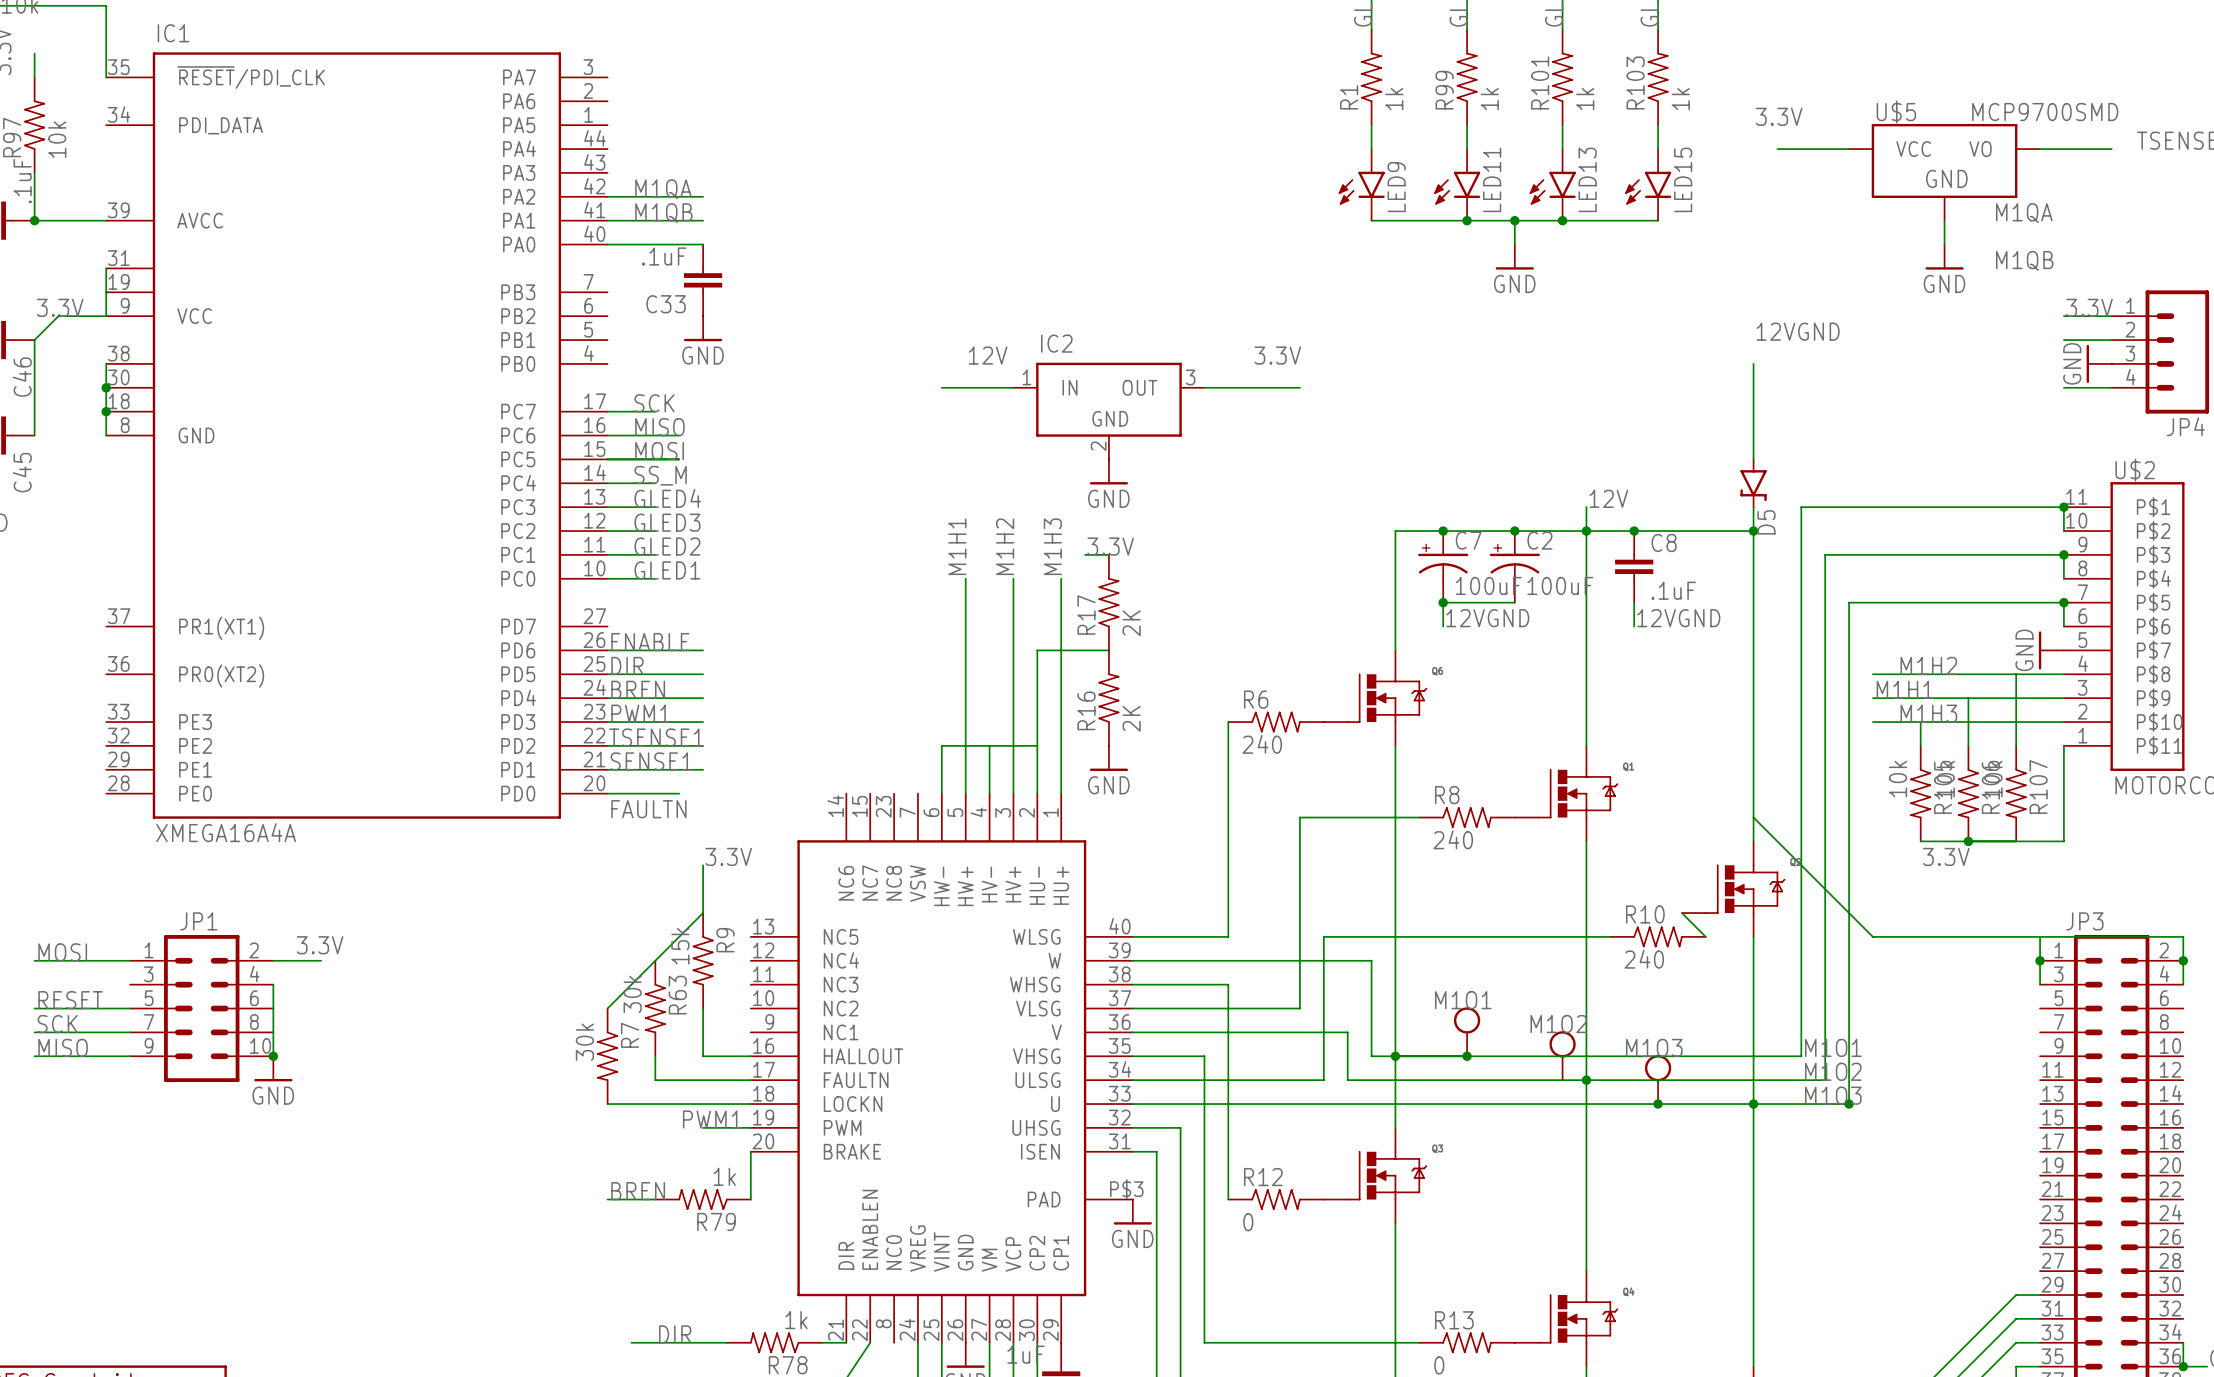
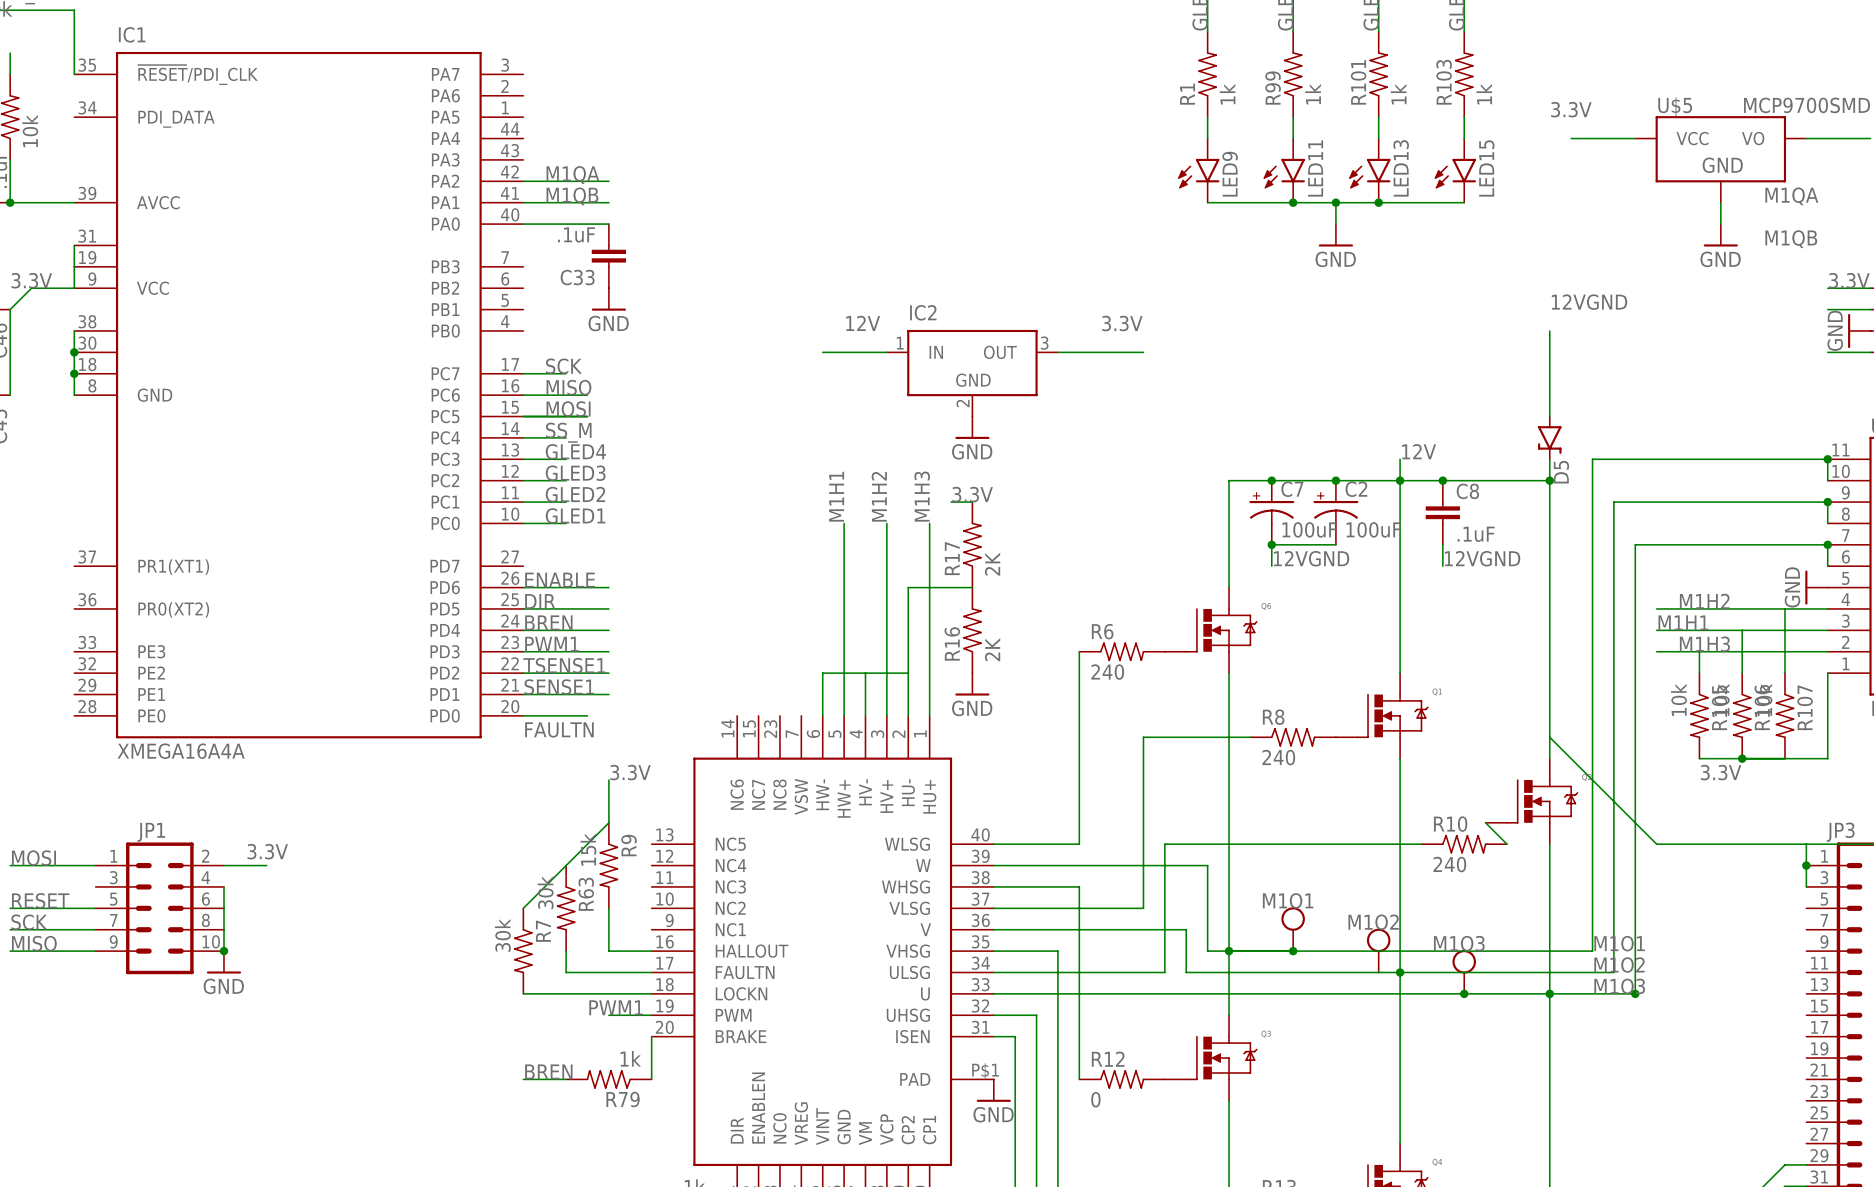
part pin number: P$3 (1126, 1189) -> P$1 (985, 1071)

